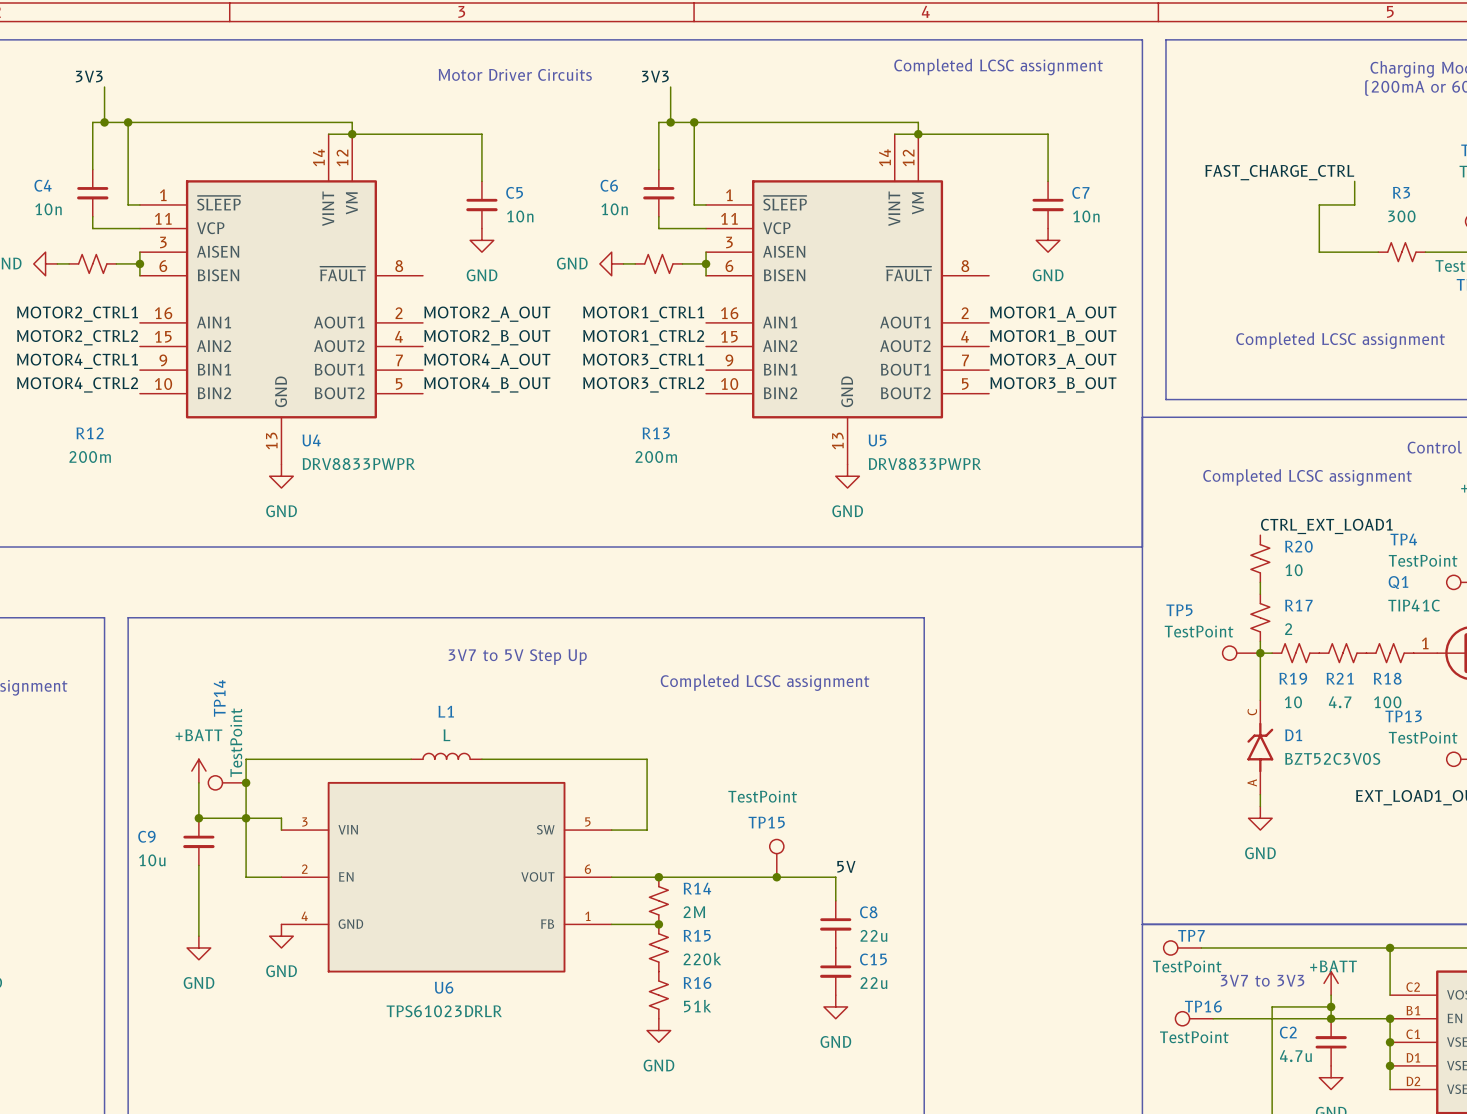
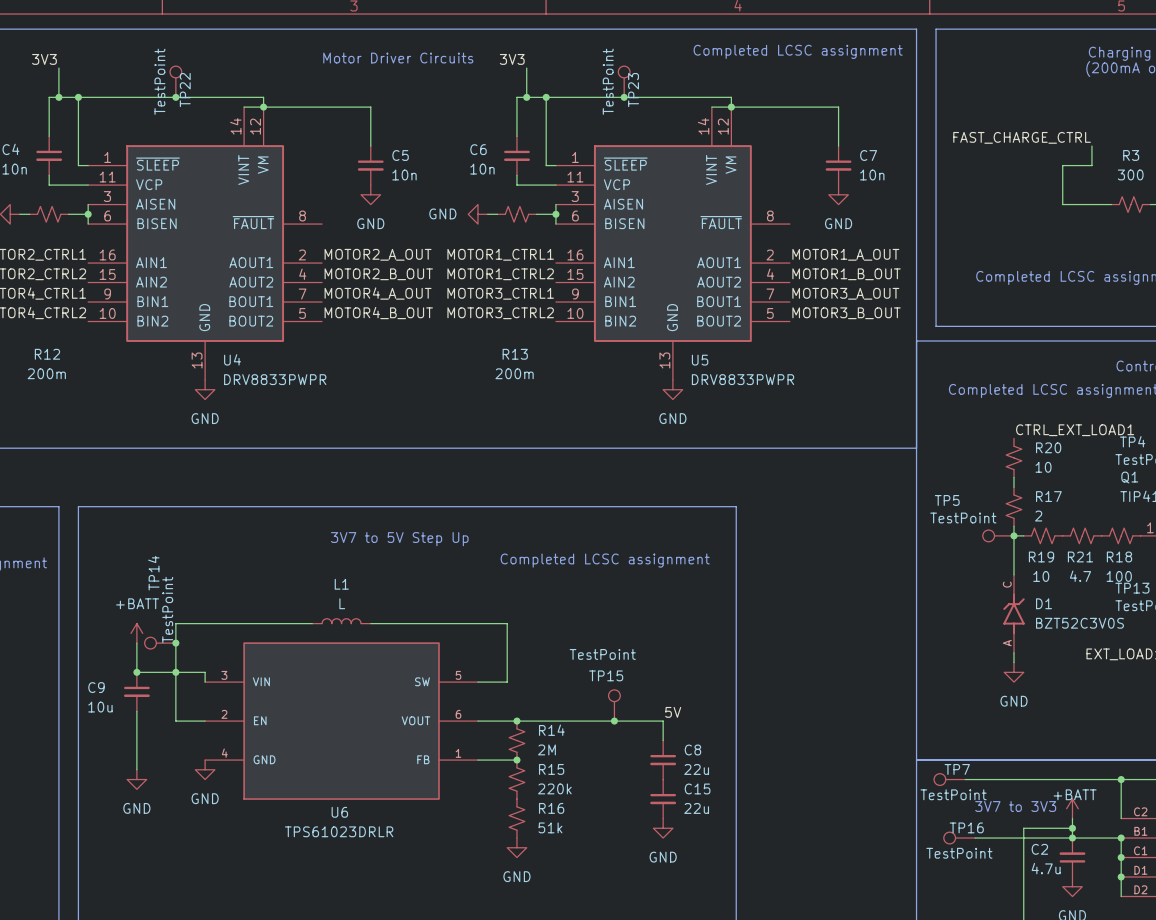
TP22: none -> TestPoint (175, 81)
TP23: none -> TestPoint (624, 81)
junction: none -> (175, 97)
junction: none -> (624, 97)

